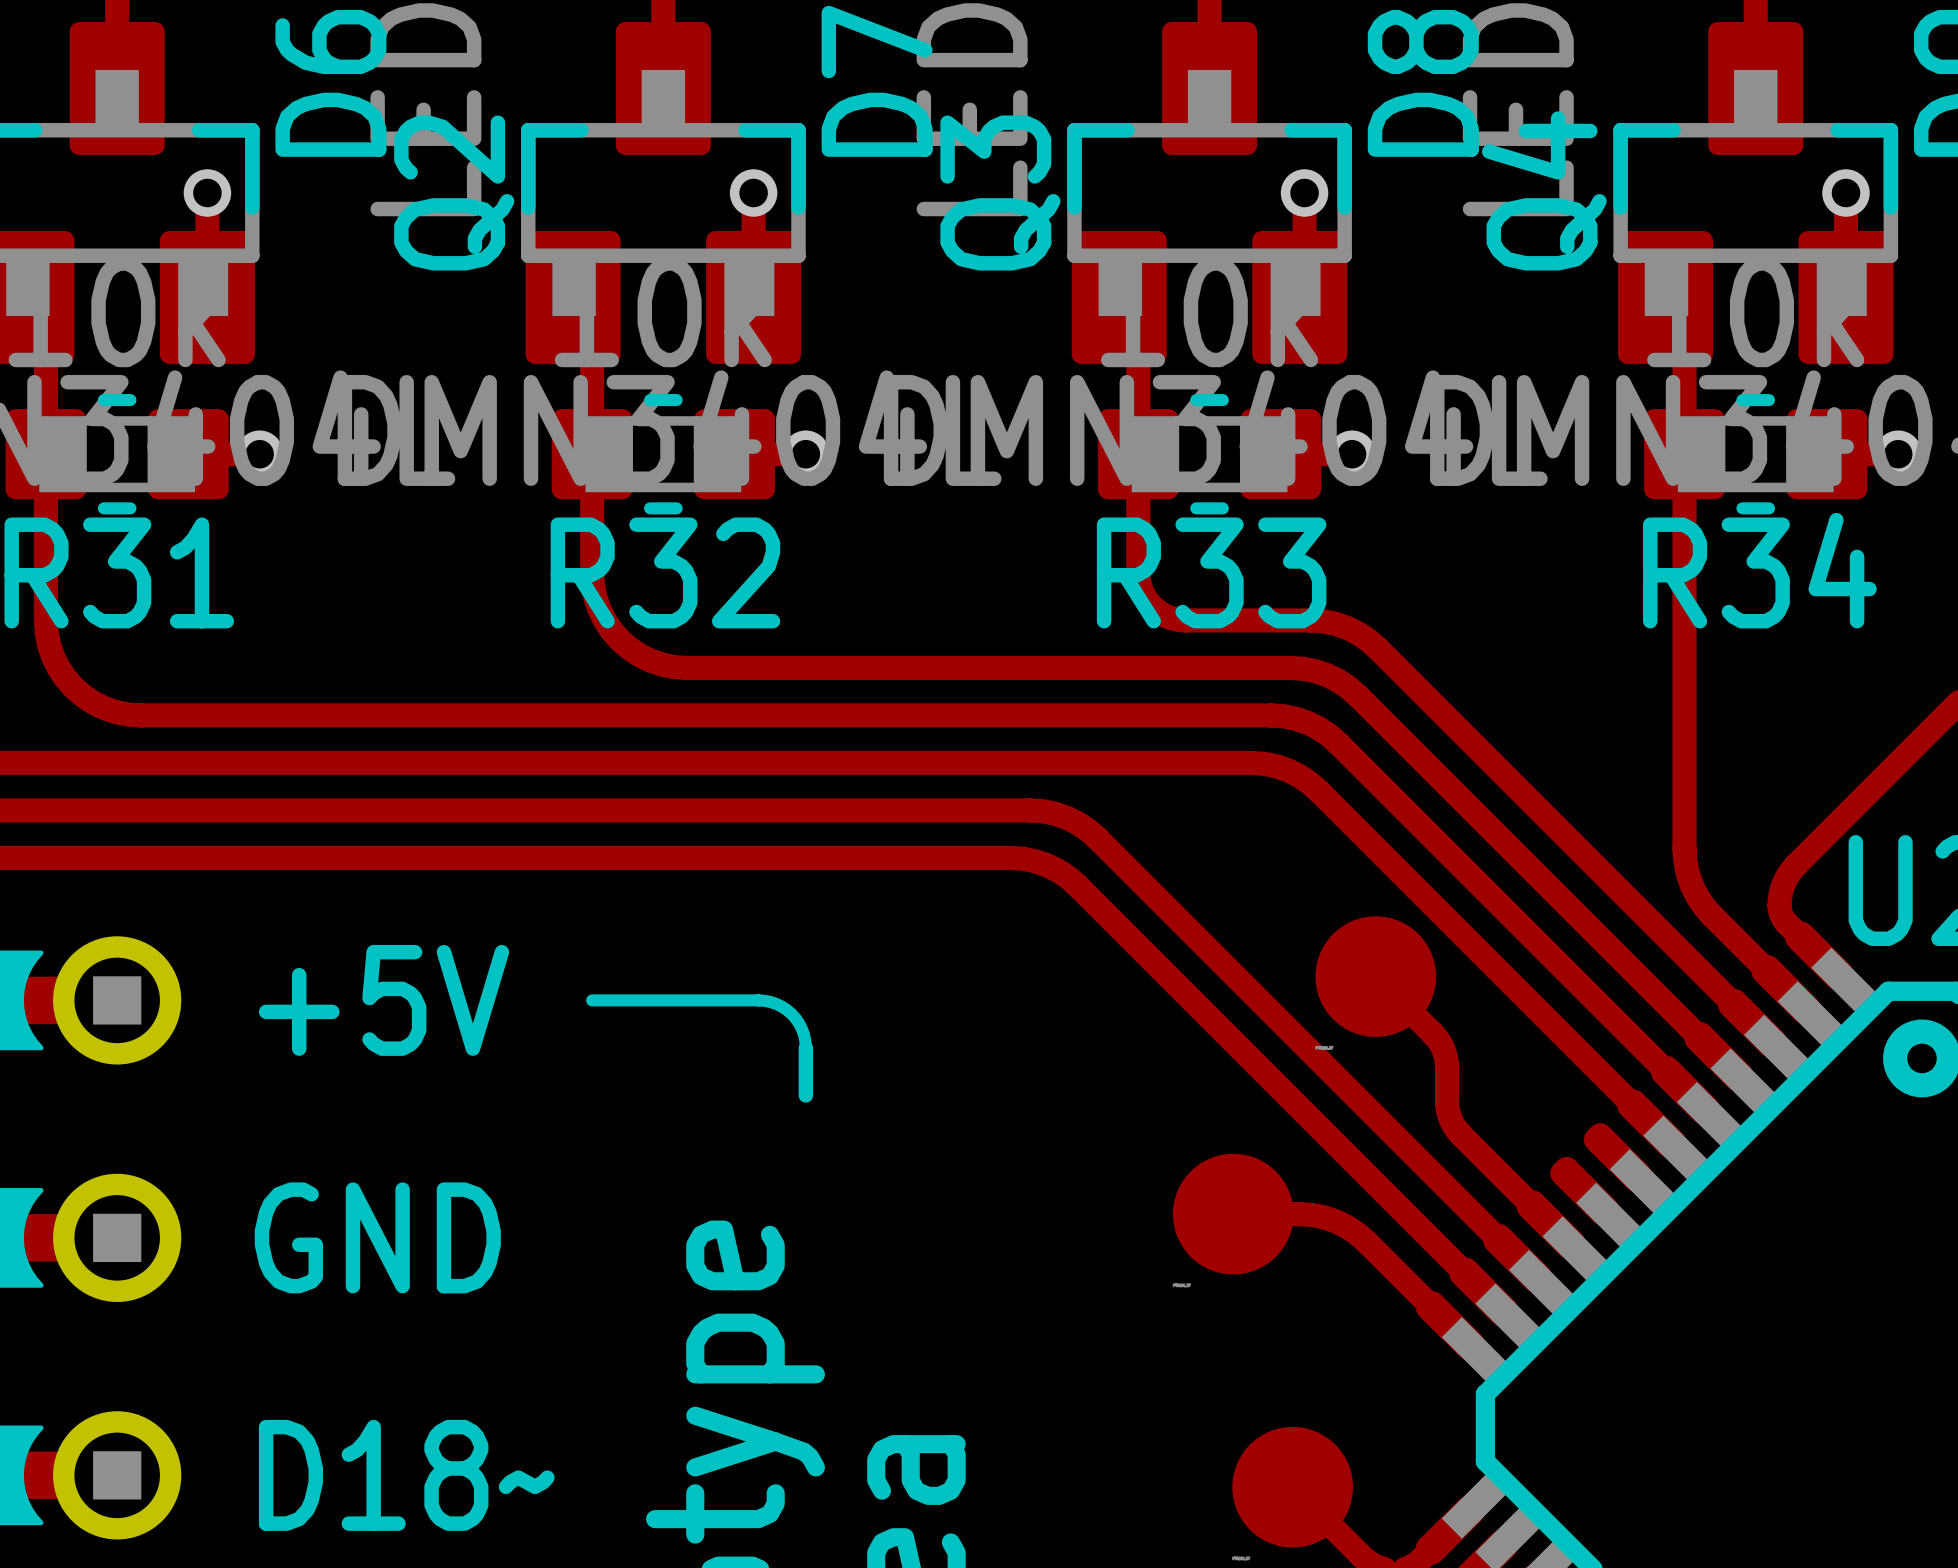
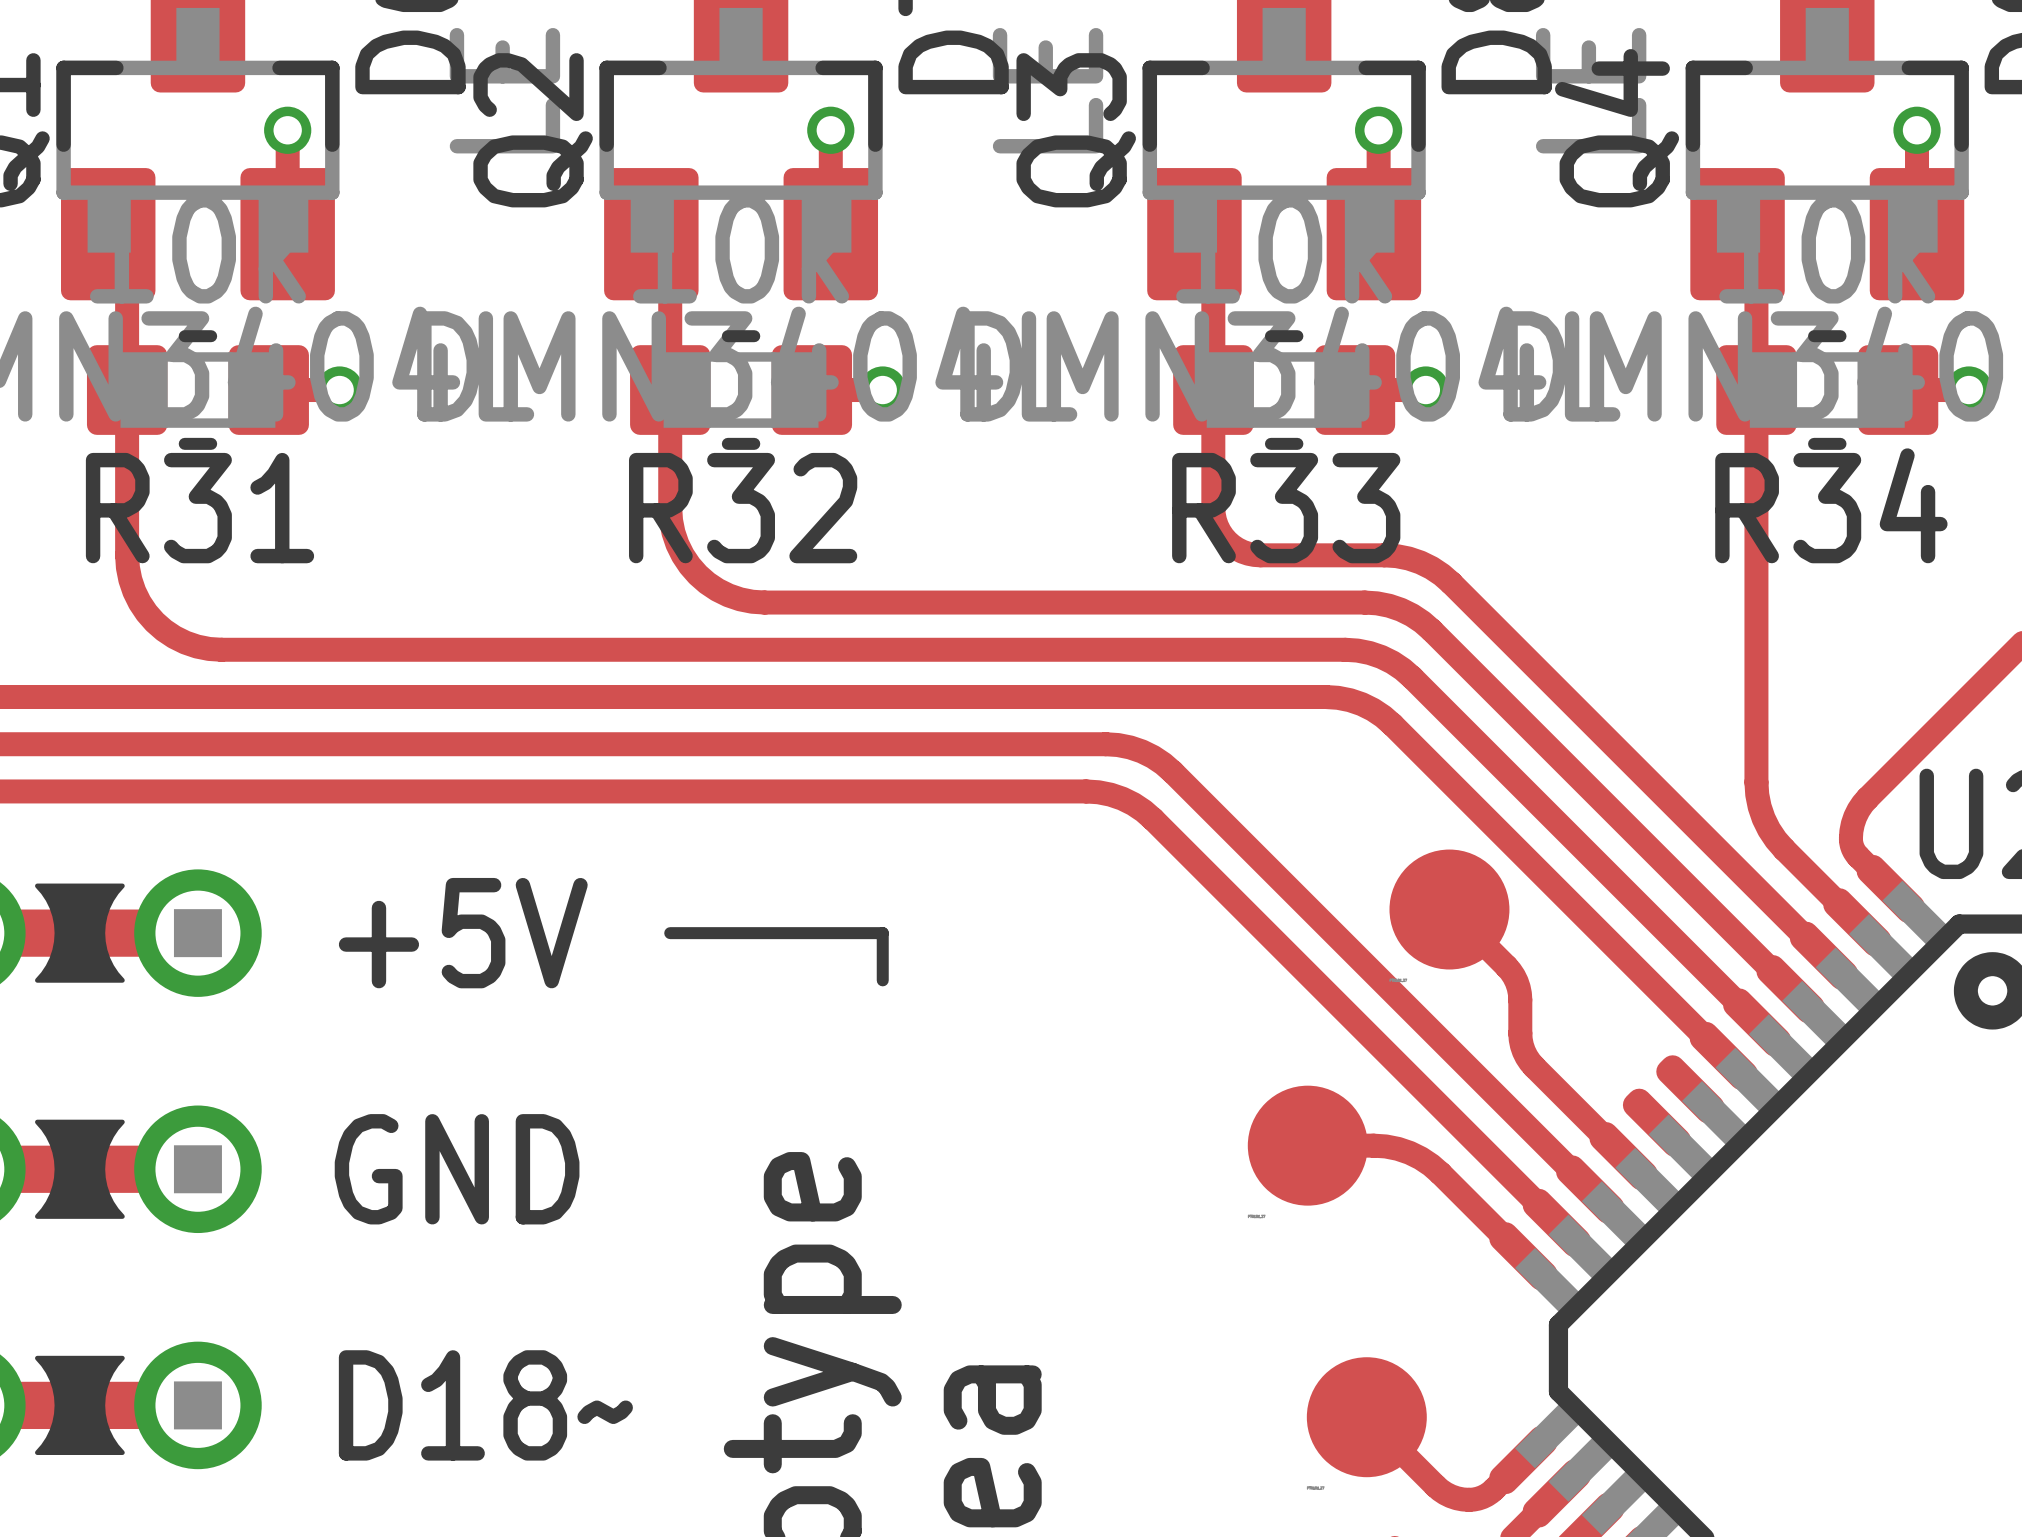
line: (758, 1000) (770, 1002) (782, 1006) (791, 1014) (799, 1024) (805, 1041) (805, 1095) -> (835, 933) (882, 933) (882, 980)

